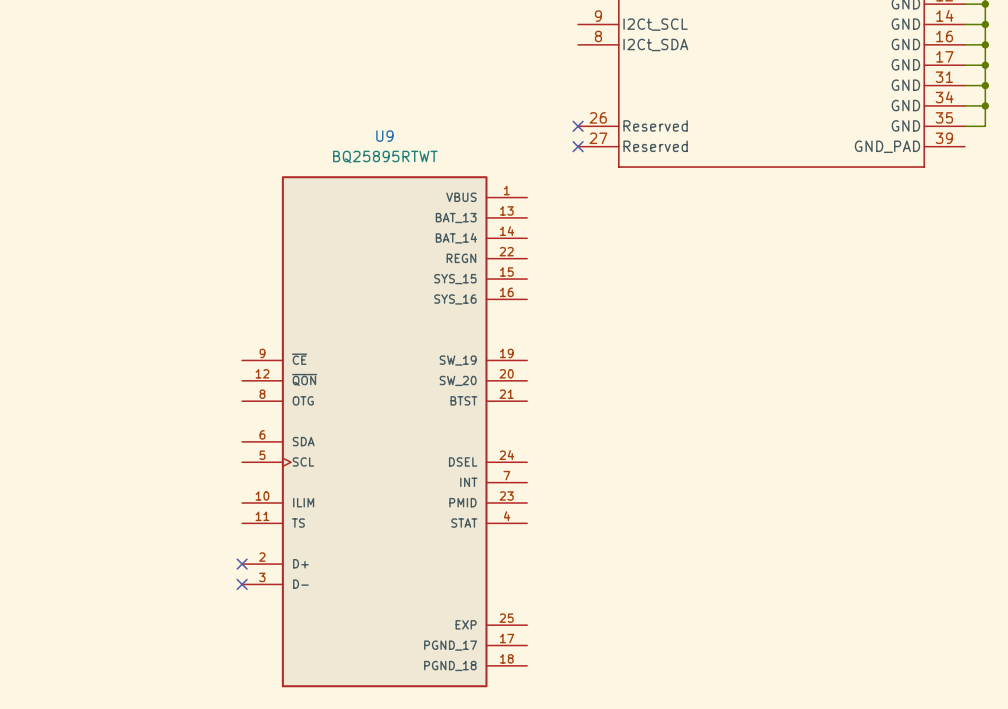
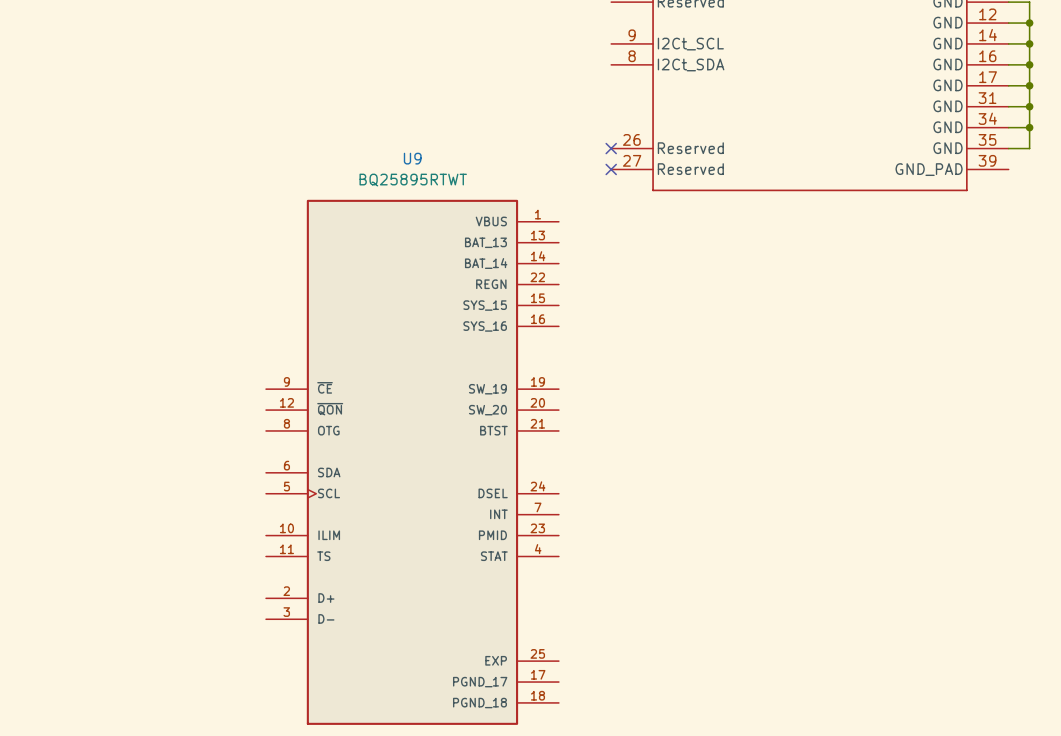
no-connect mark: (242, 564) -> none
no-connect mark: (242, 584) -> none

